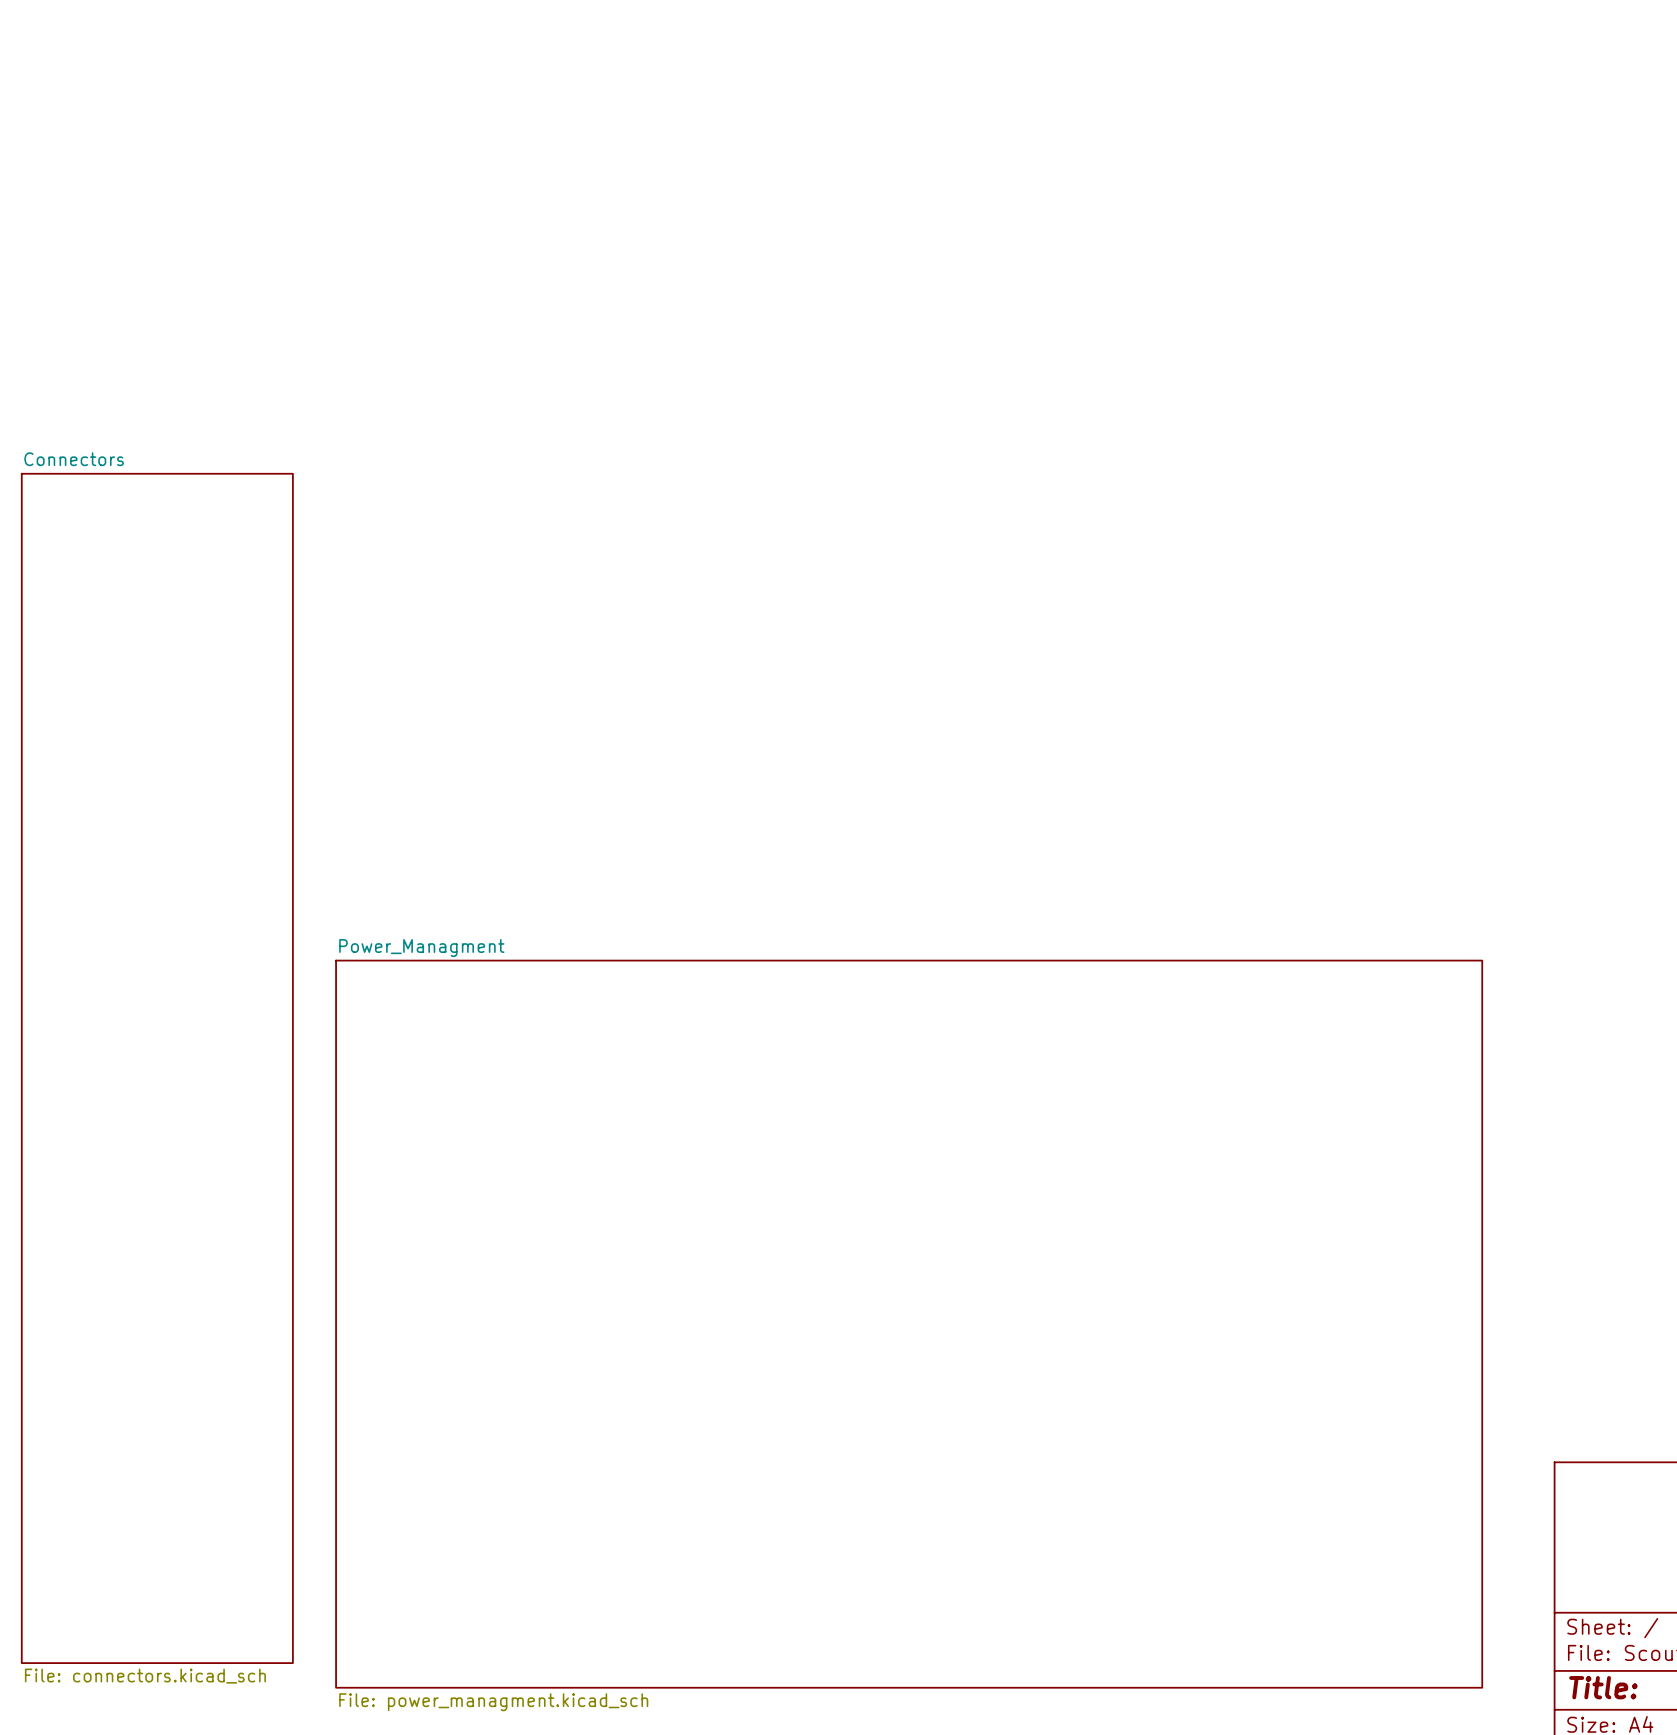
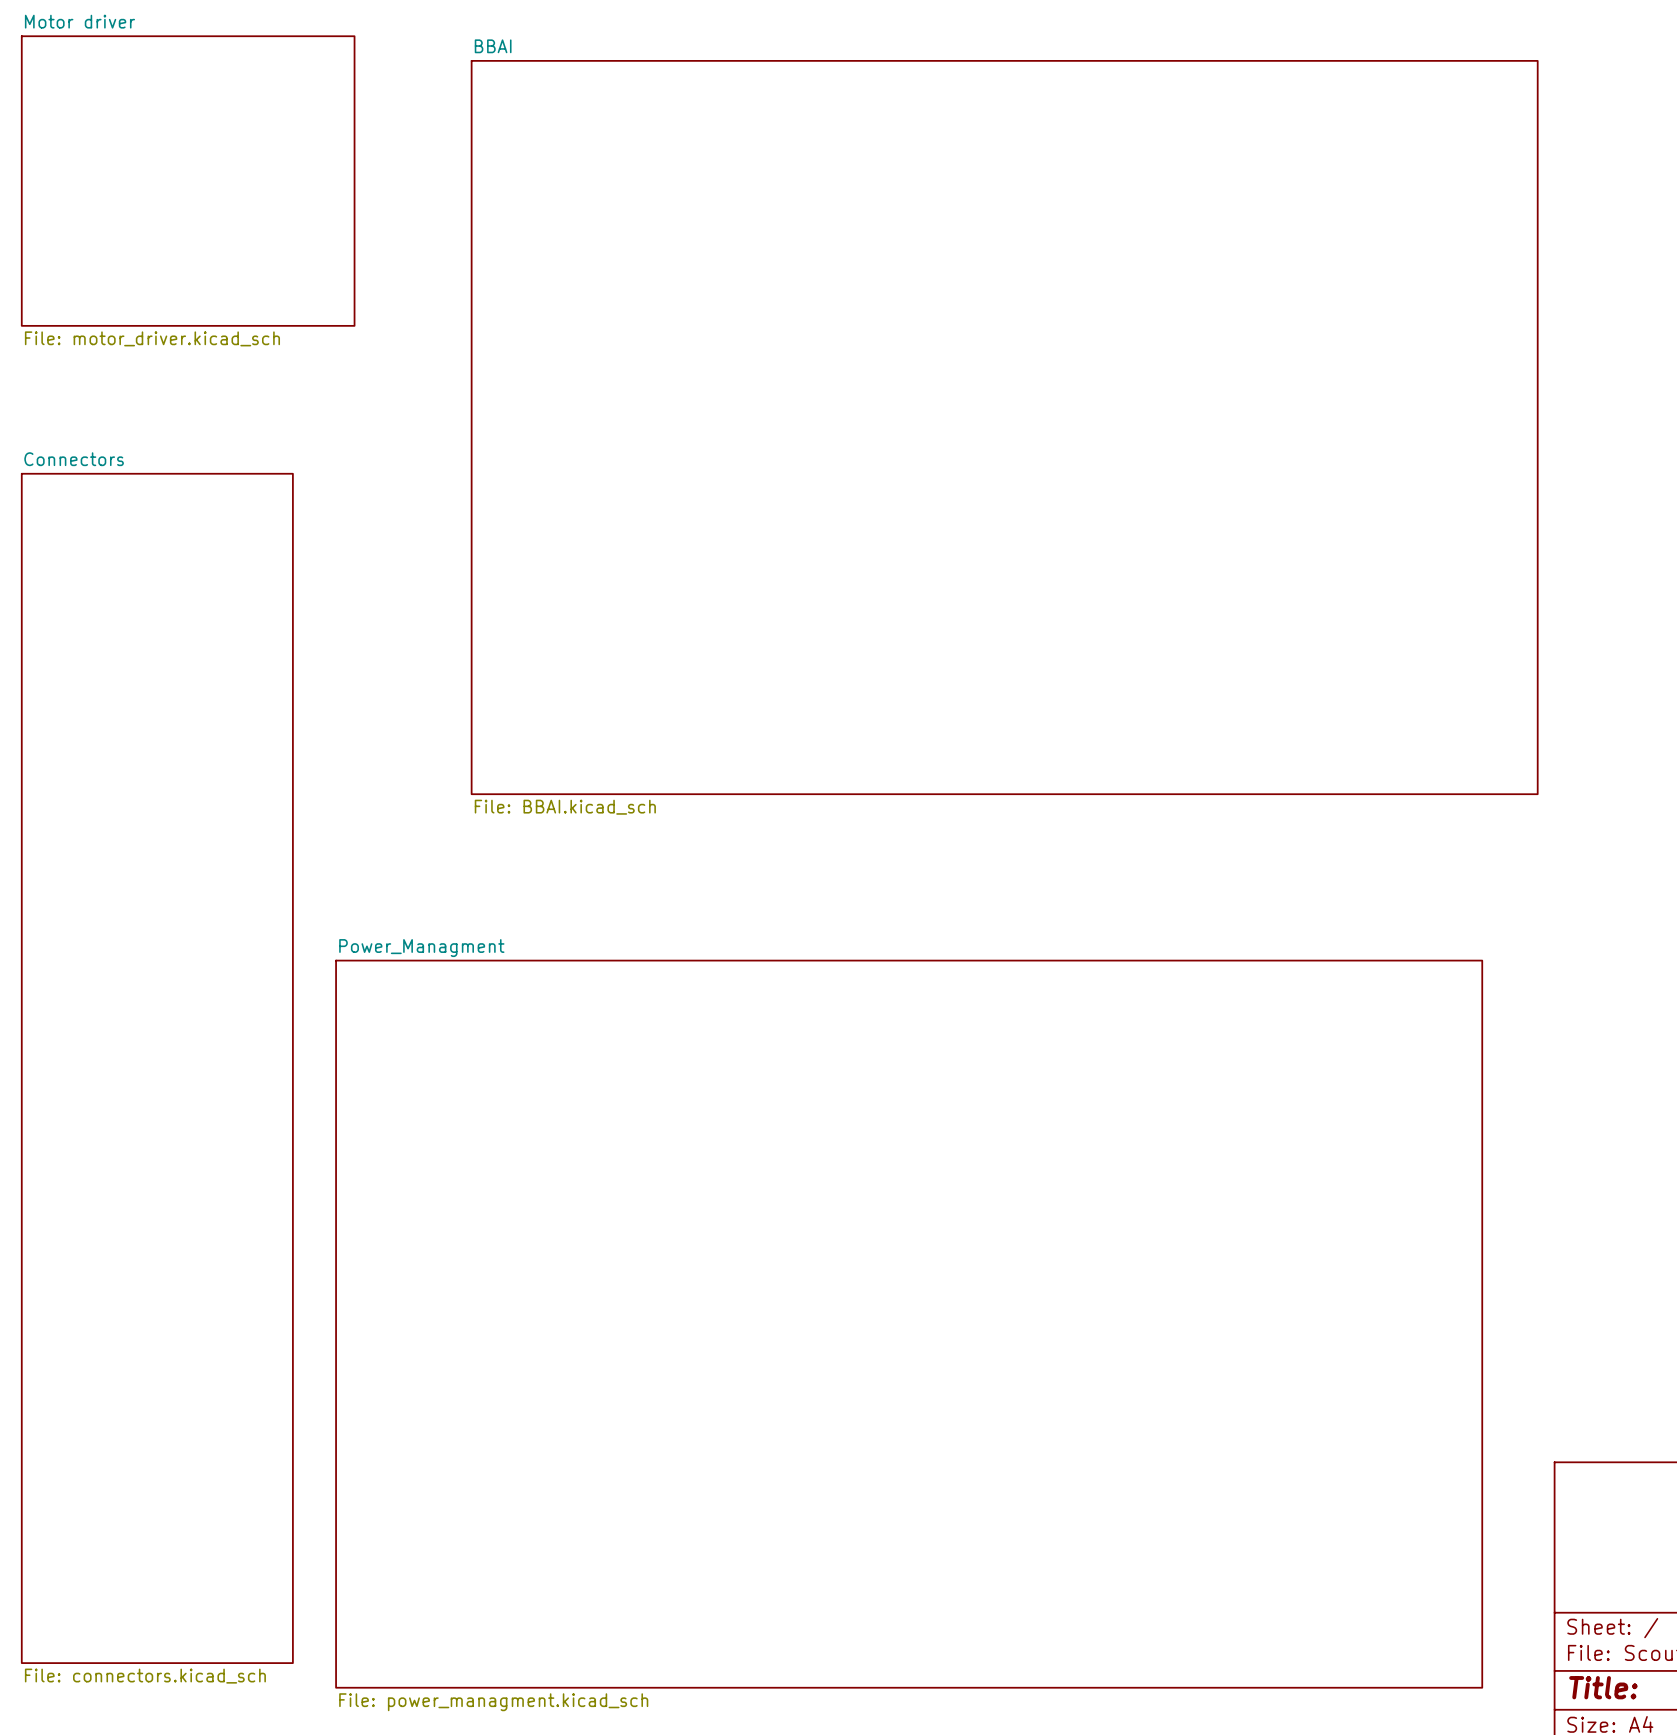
sheet Motor driver: none -> File: motor_driver.kicad_sch (188, 181)
sheet BBAI: none -> File: BBAI.kicad_sch (1004, 427)

